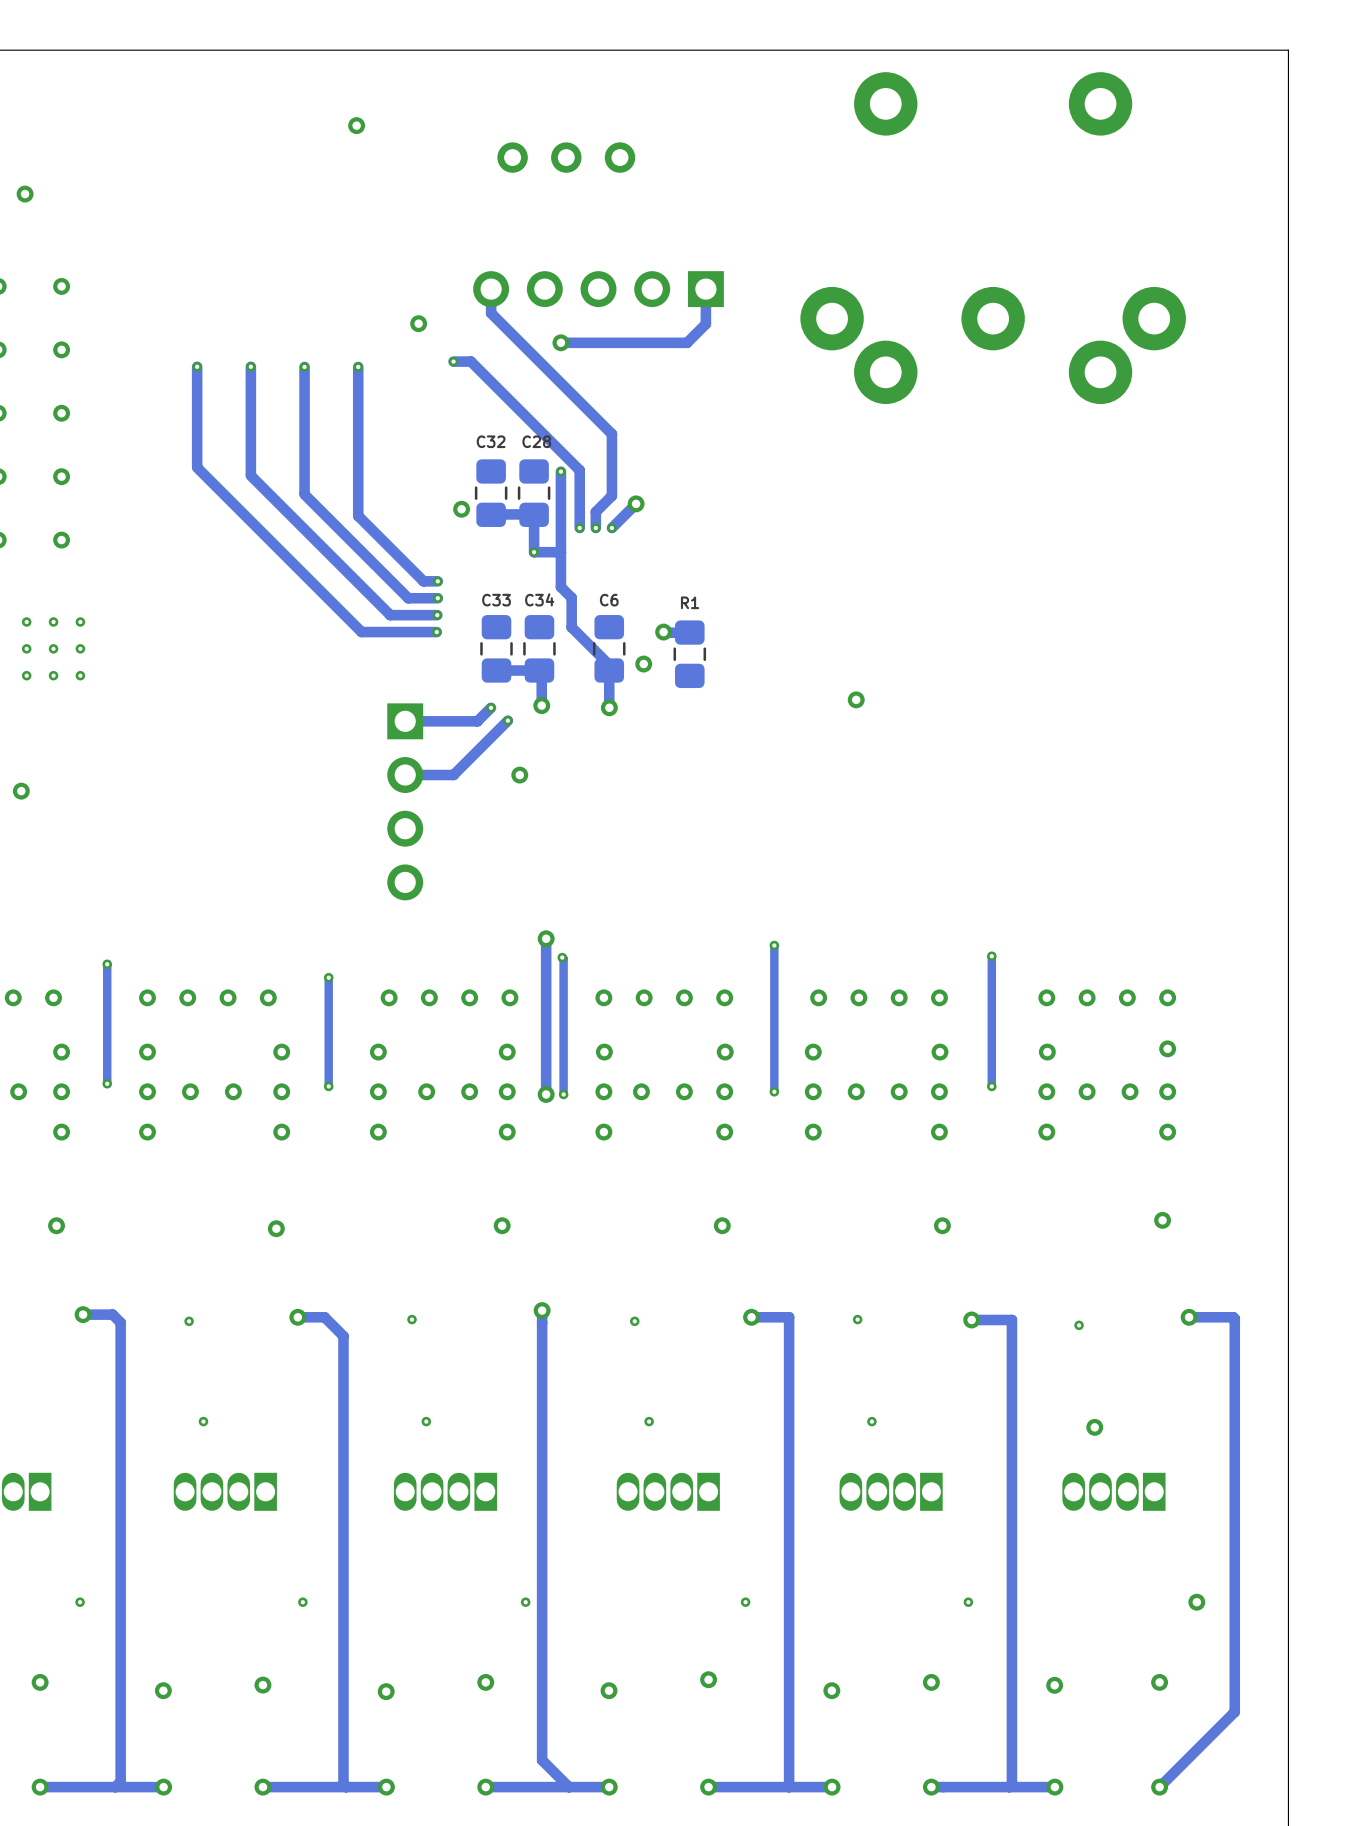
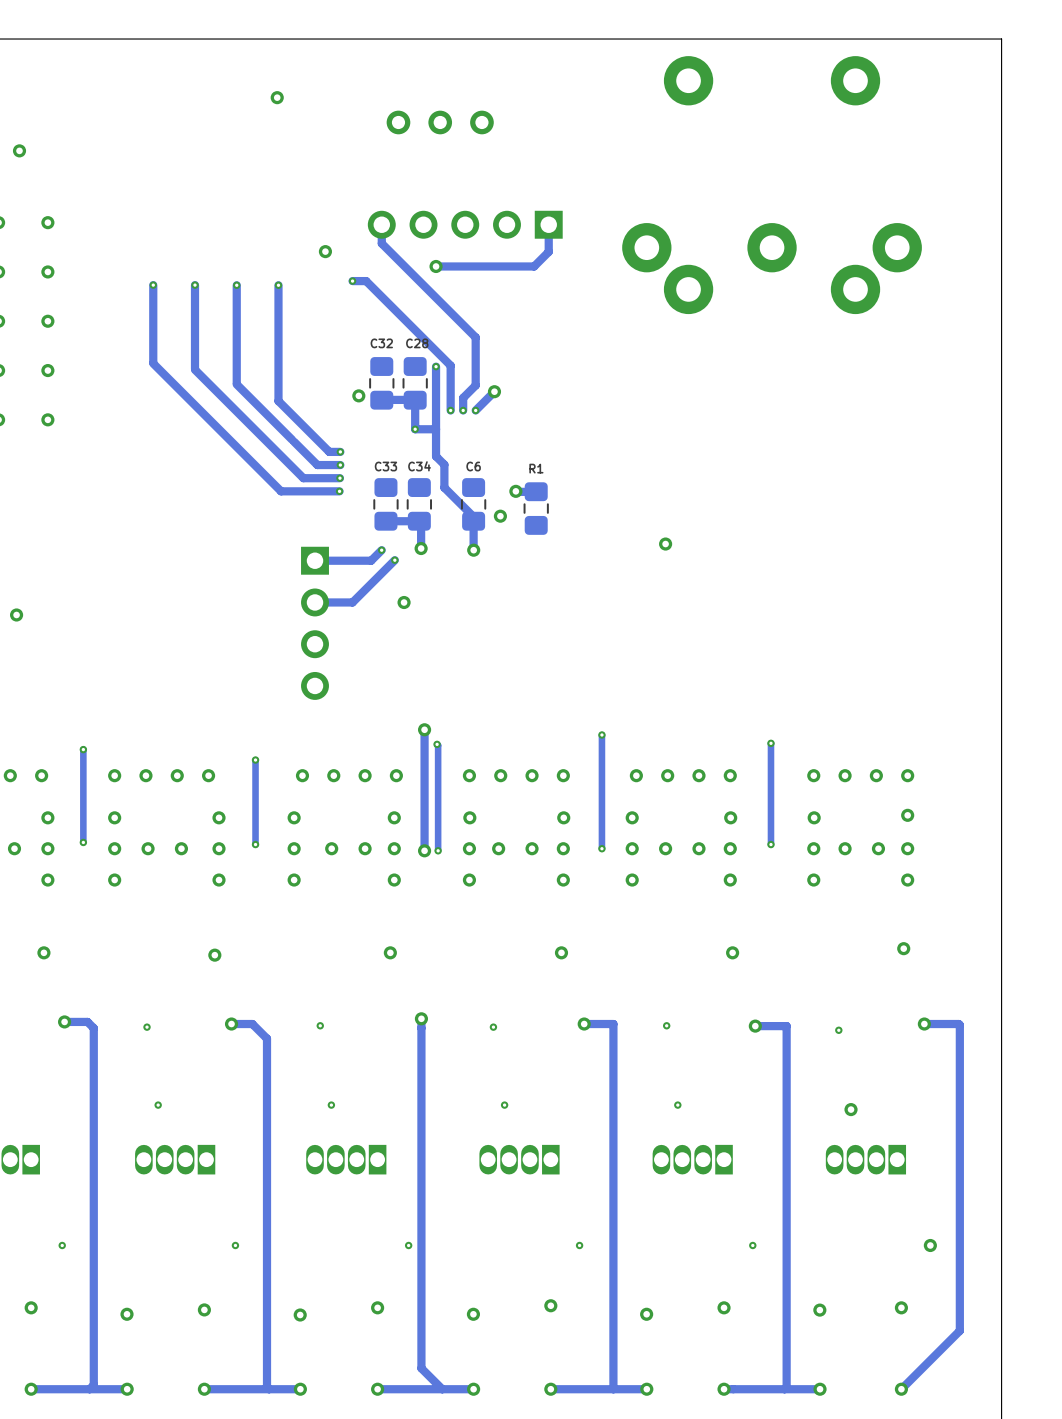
via: (26, 622) -> none
via: (53, 622) -> none
via: (80, 622) -> none
via: (26, 648) -> none
via: (53, 648) -> none
via: (80, 648) -> none
via: (26, 675) -> none
via: (53, 675) -> none
via: (80, 675) -> none

